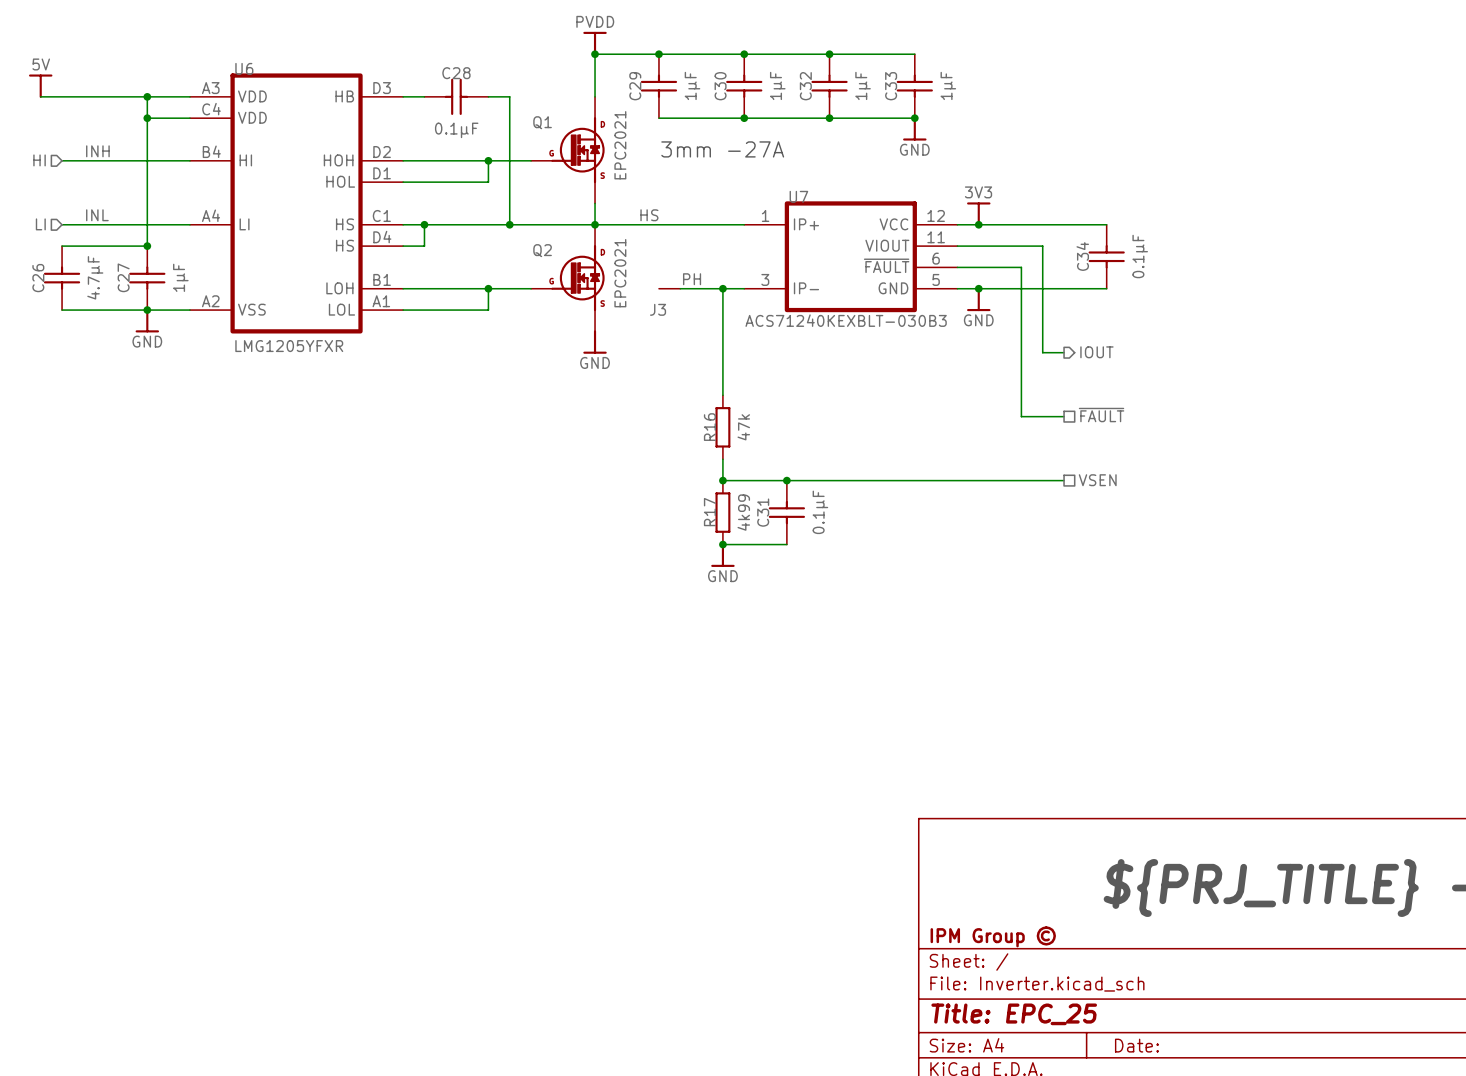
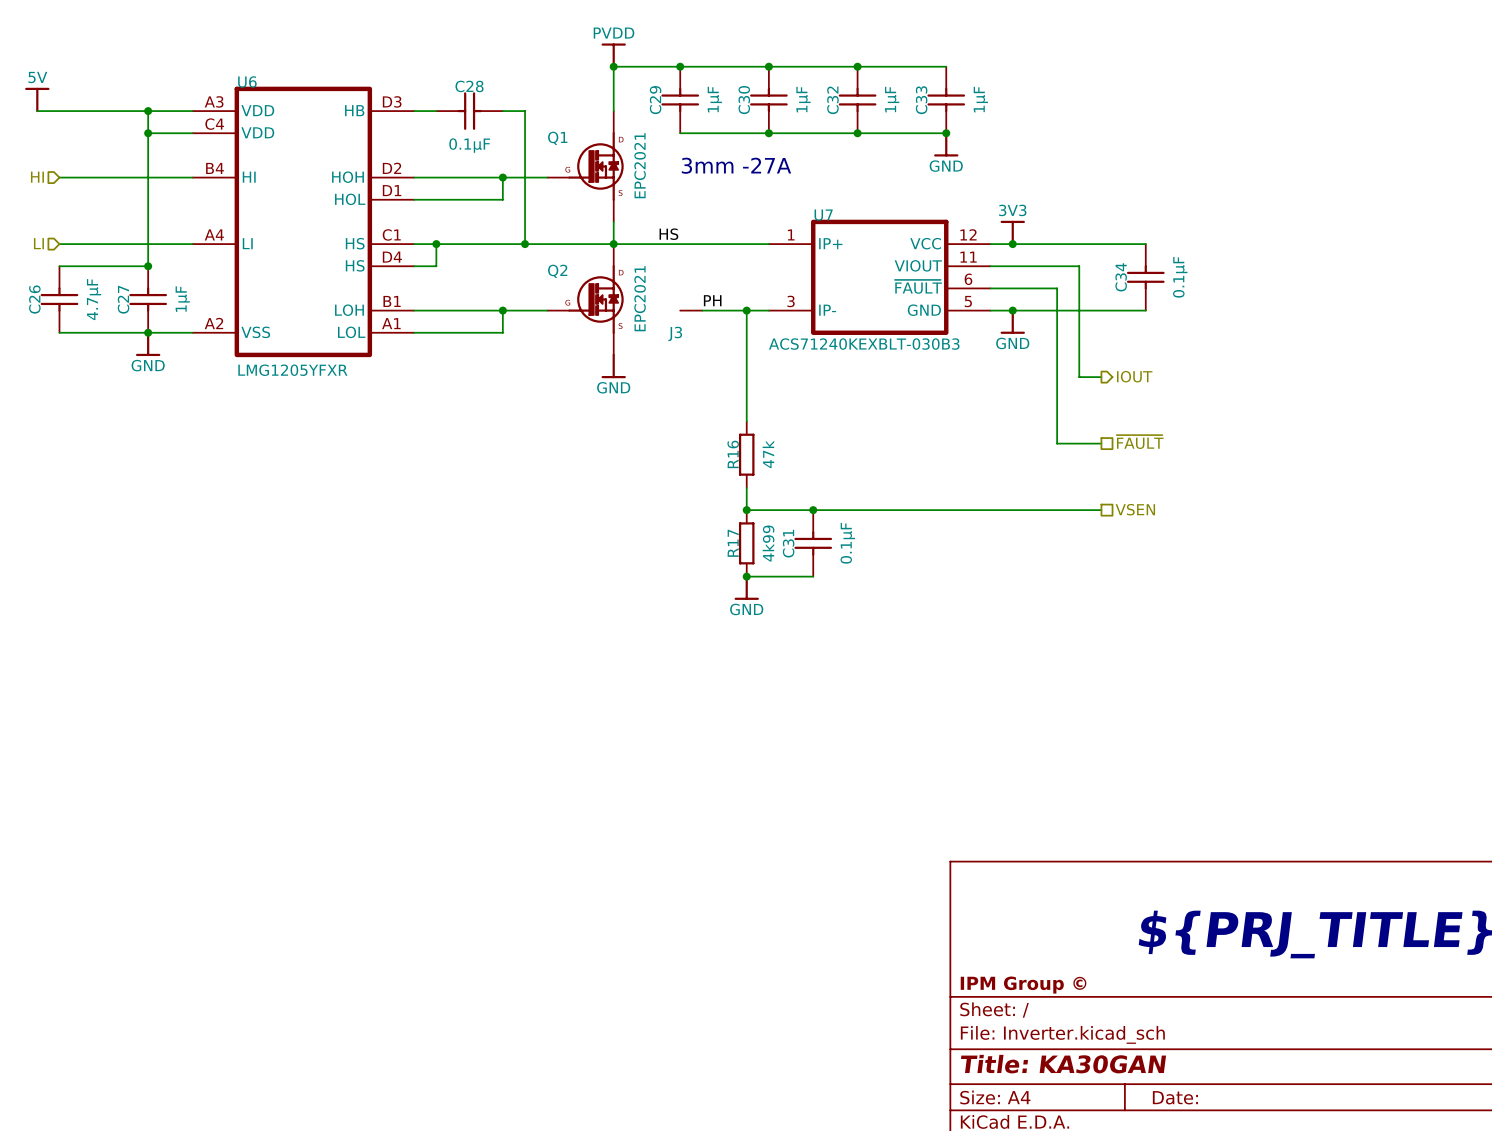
label: INH (97, 151) -> none
label: INL (97, 215) -> none
title block: Title: EPC_25 (1014, 1014) -> Title: KA30GAN (1063, 1064)

